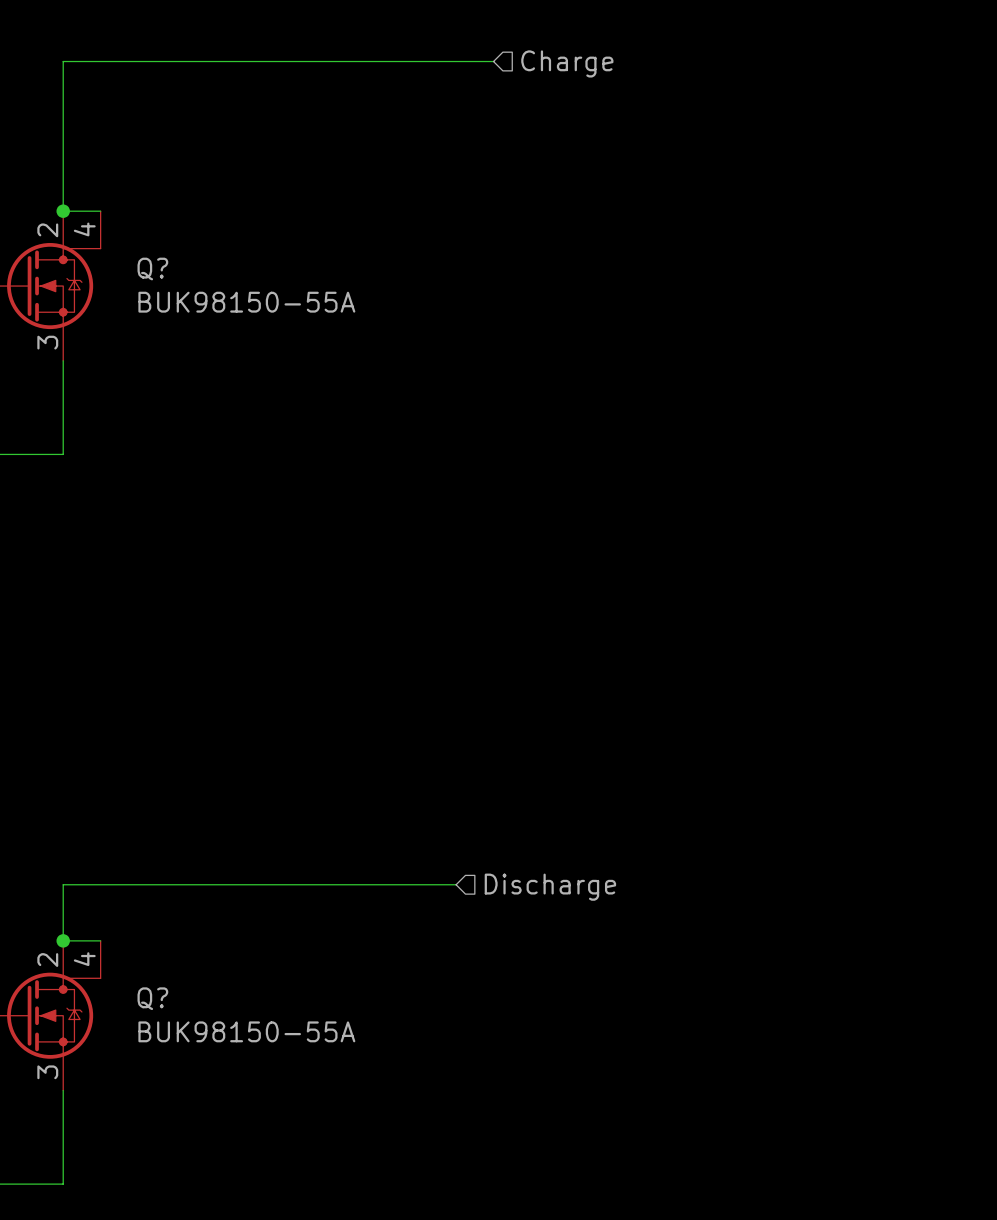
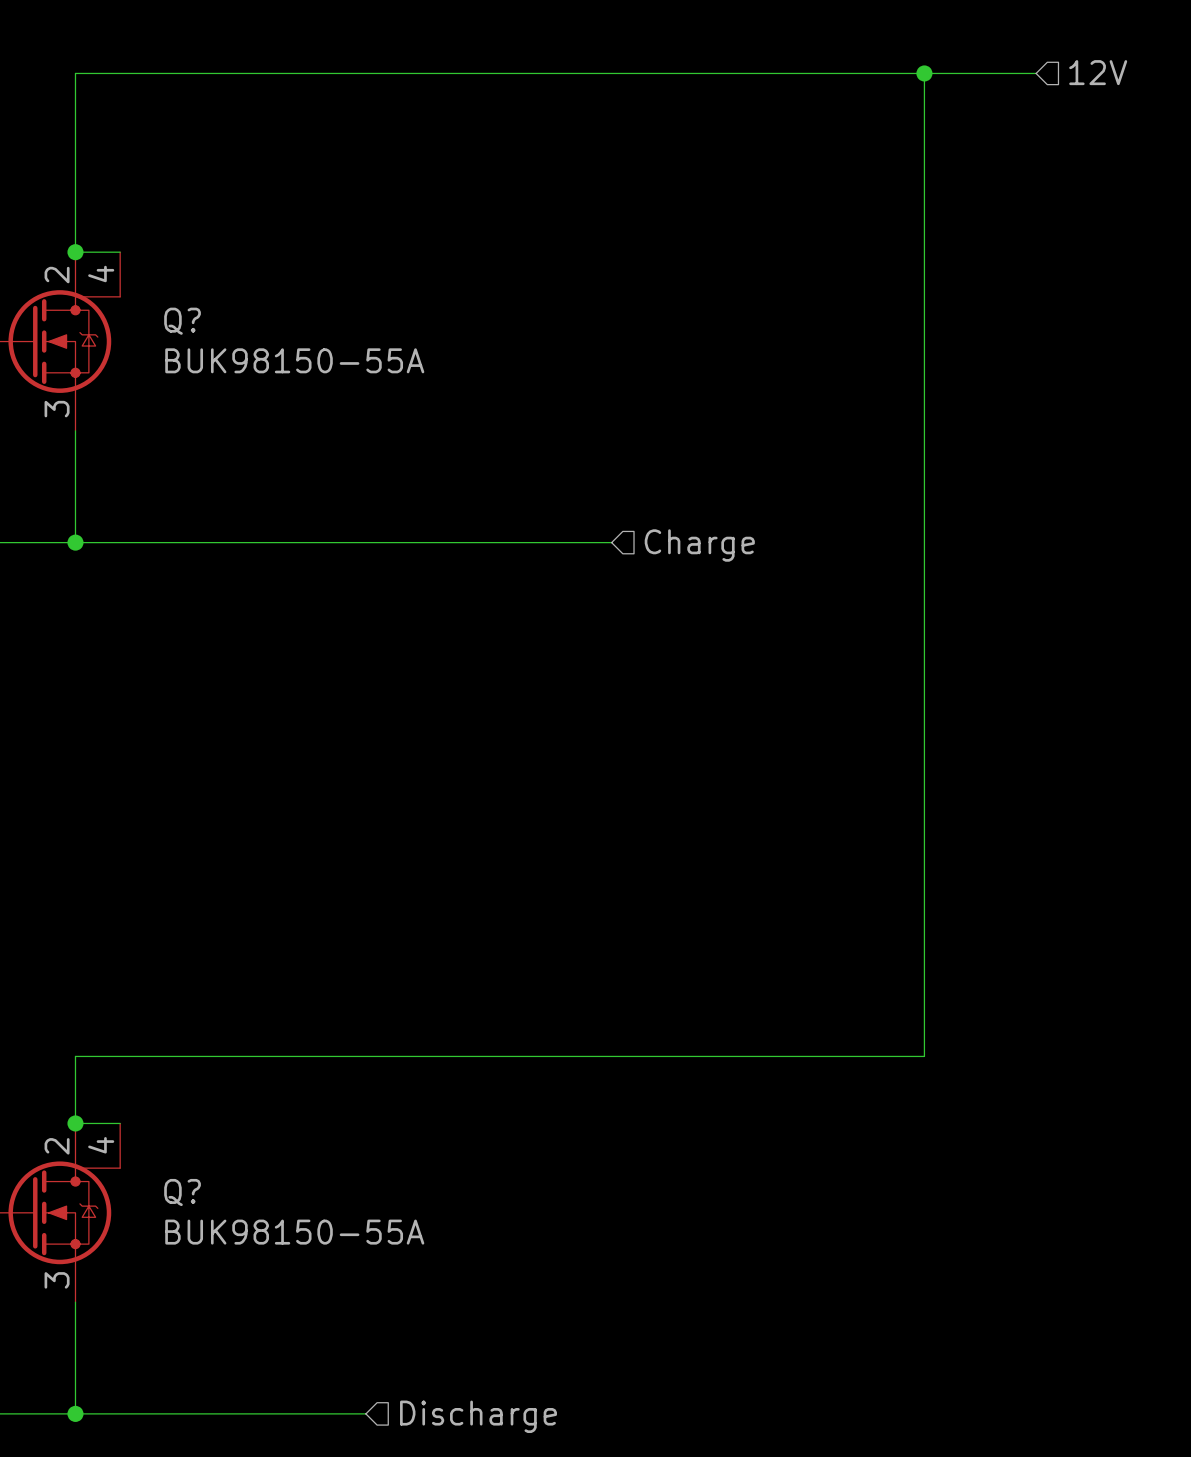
hierarchical label: none -> 12V (1098, 72)
wire: none -> (589, 73) (1036, 73)
wire: none -> (924, 73) (924, 1056) (544, 1056)
junction: none -> (924, 73)
hierarchical label: Charge (567, 63) -> none
wire: none -> (75, 542) (611, 542)
junction: none -> (75, 542)
hierarchical label: none -> Charge (699, 545)
hierarchical label position: Discharge (550, 887) -> Discharge (478, 1416)
wire: none -> (75, 1413) (365, 1413)
junction: none -> (75, 1413)

